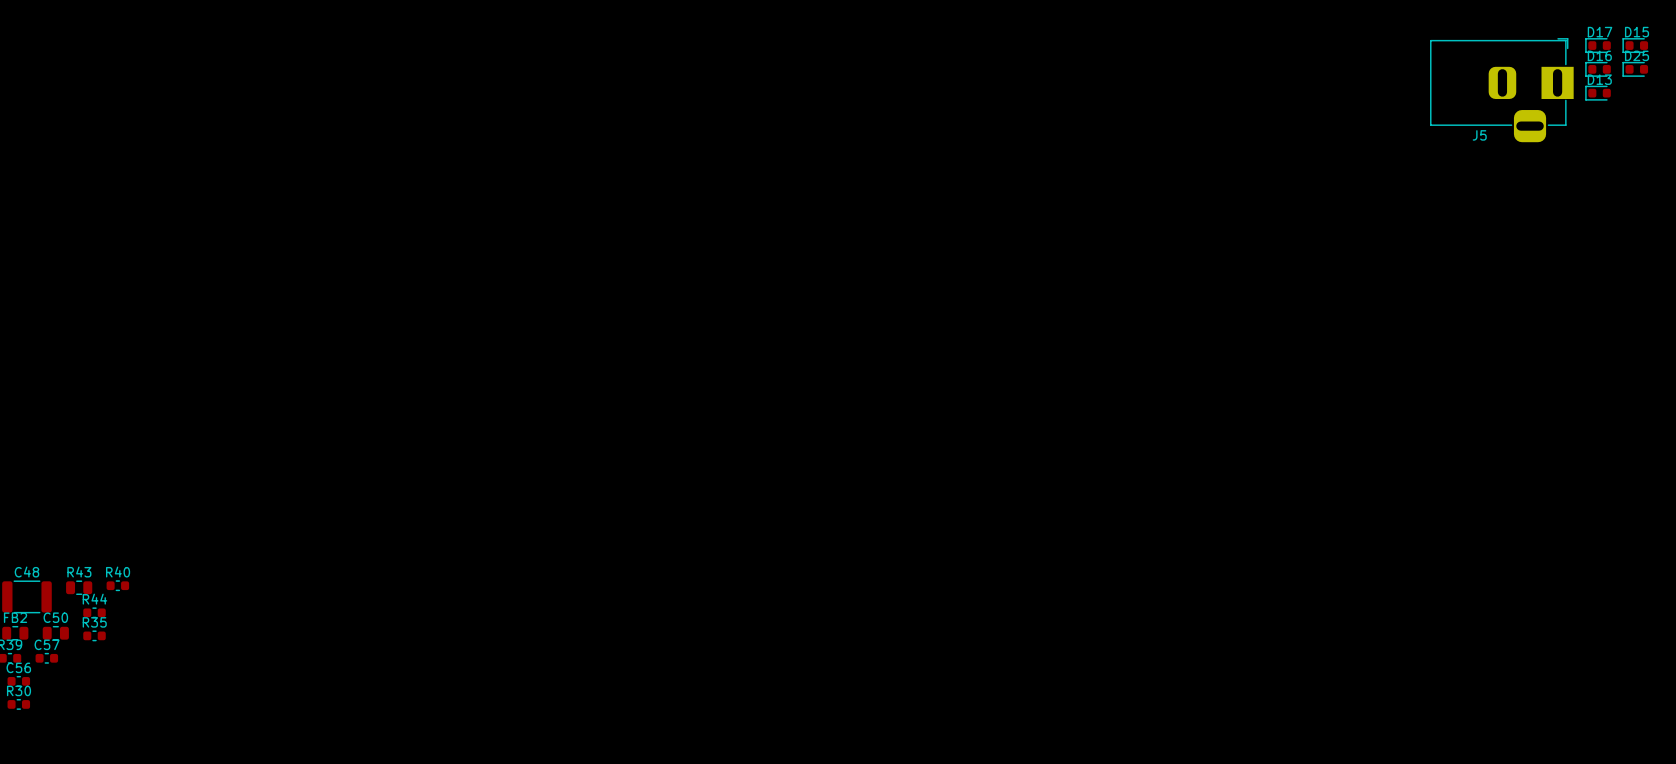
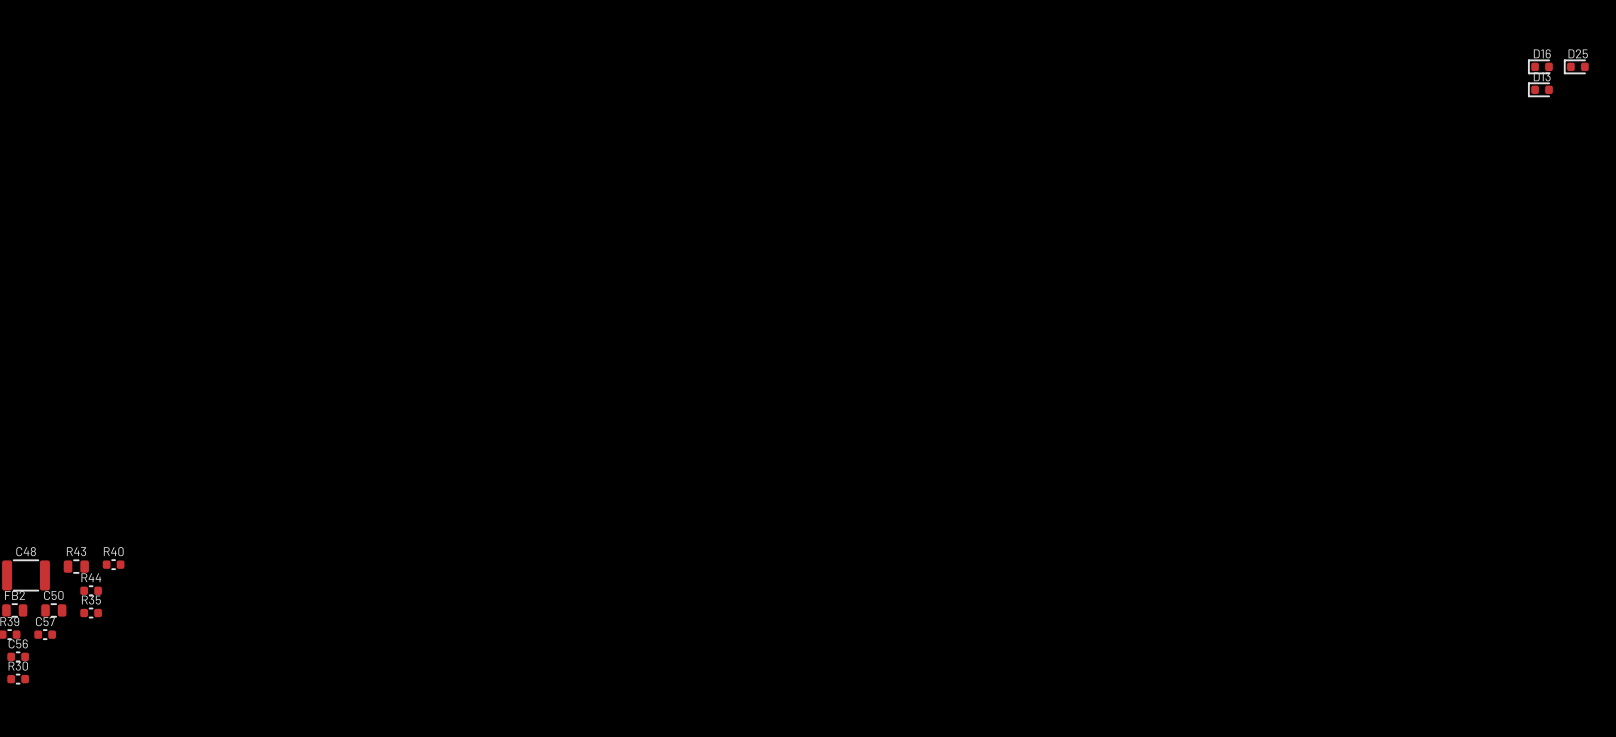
D17: (1598, 45) -> none
D15: (1635, 45) -> none
J5: (1501, 90) -> none

